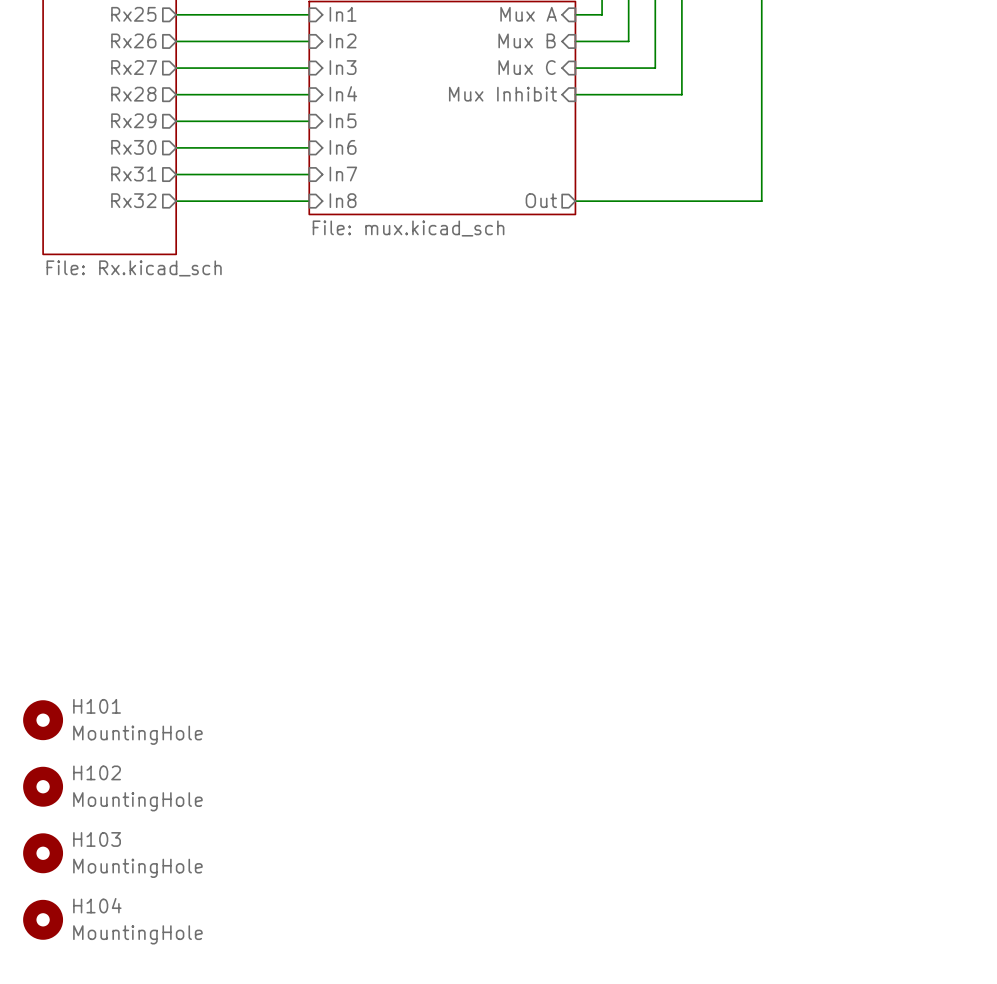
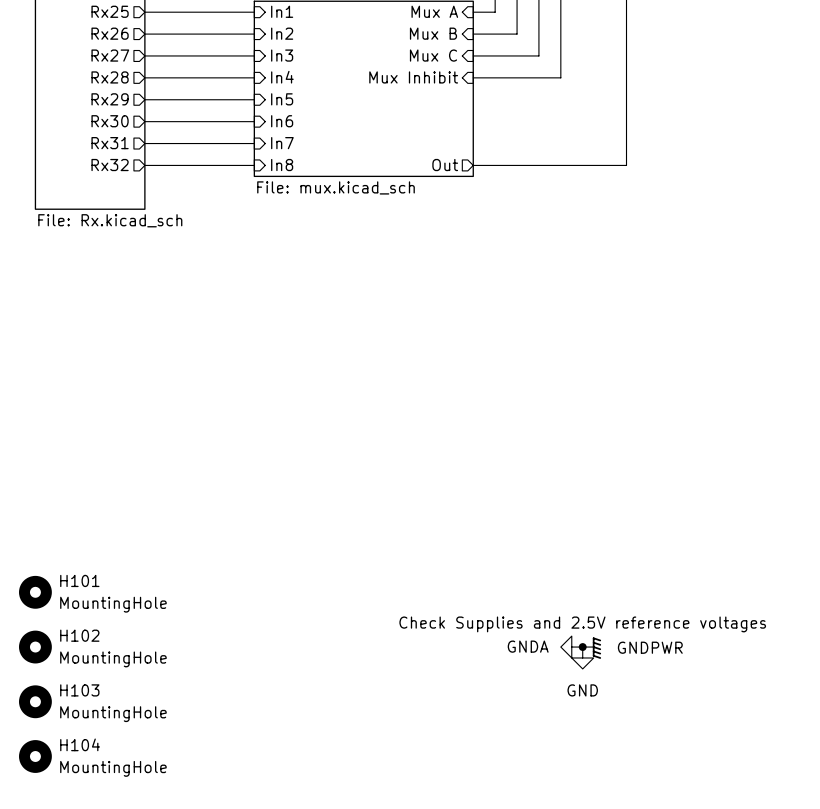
text: none -> Check Supplies and 2.5V reference voltages (582, 624)
power symbol: none -> GNDA (571, 647)
junction: none -> (582, 647)
power symbol: none -> GNDPWR (591, 648)
power symbol: none -> GND (582, 657)

